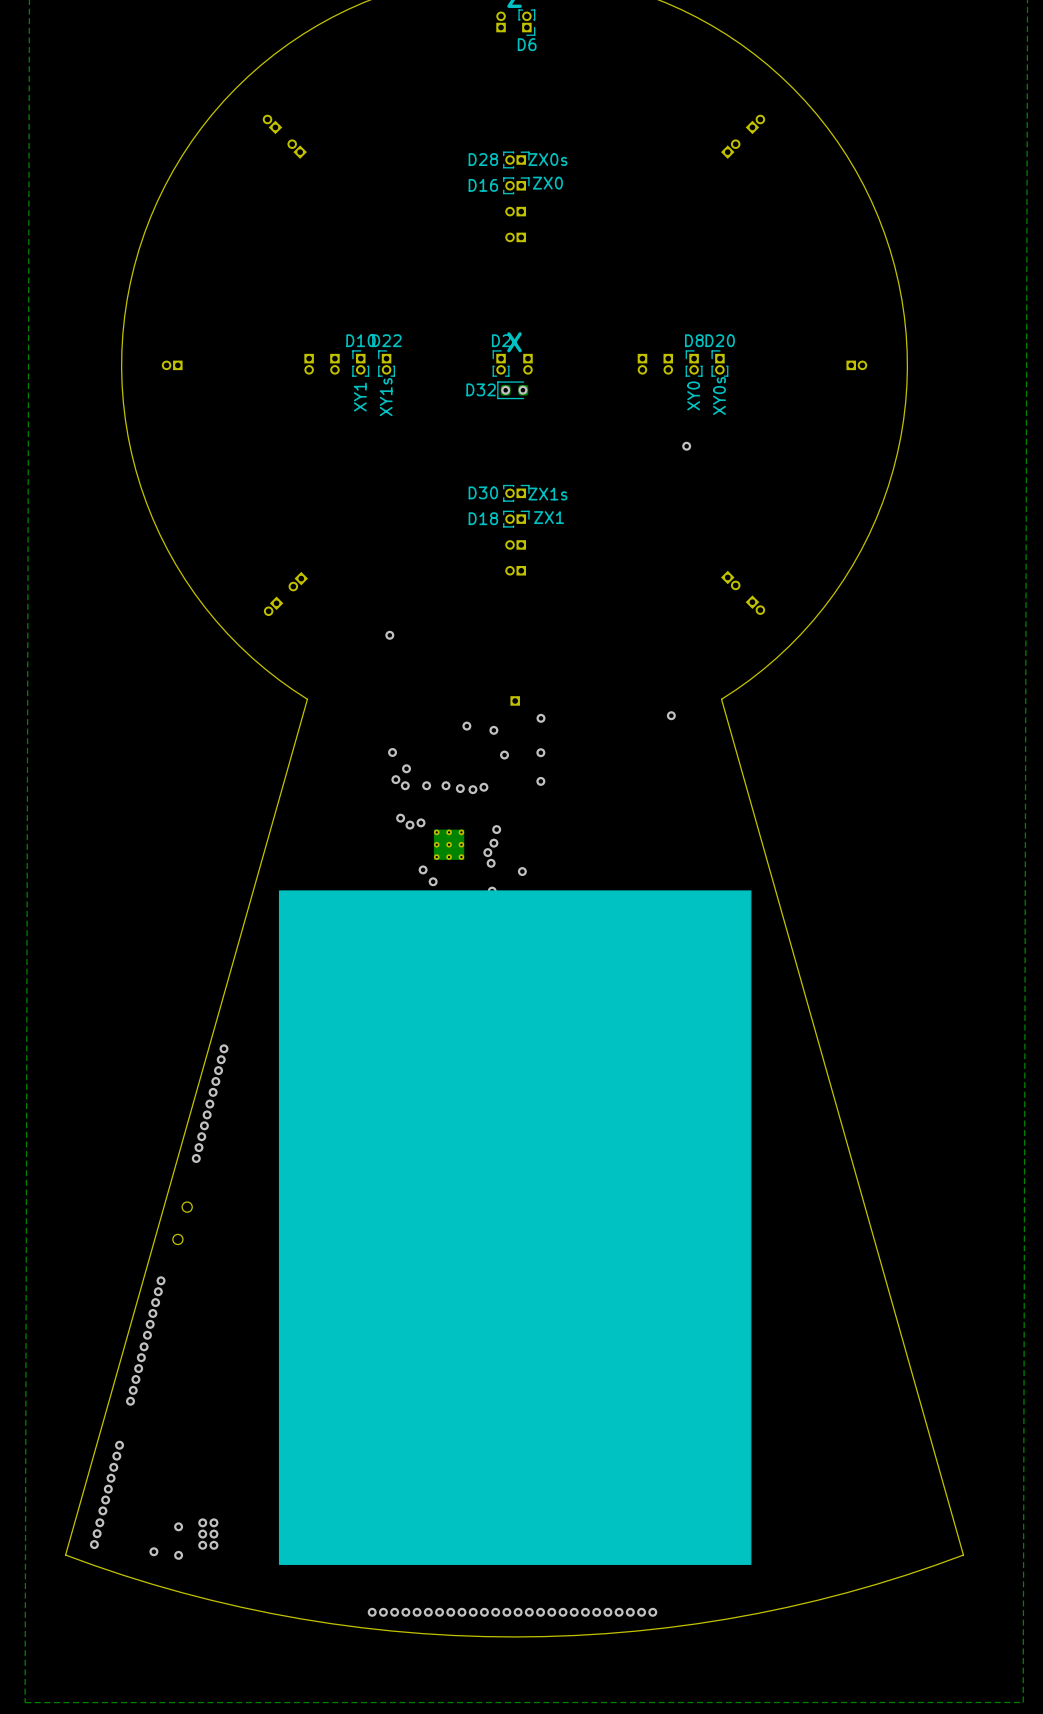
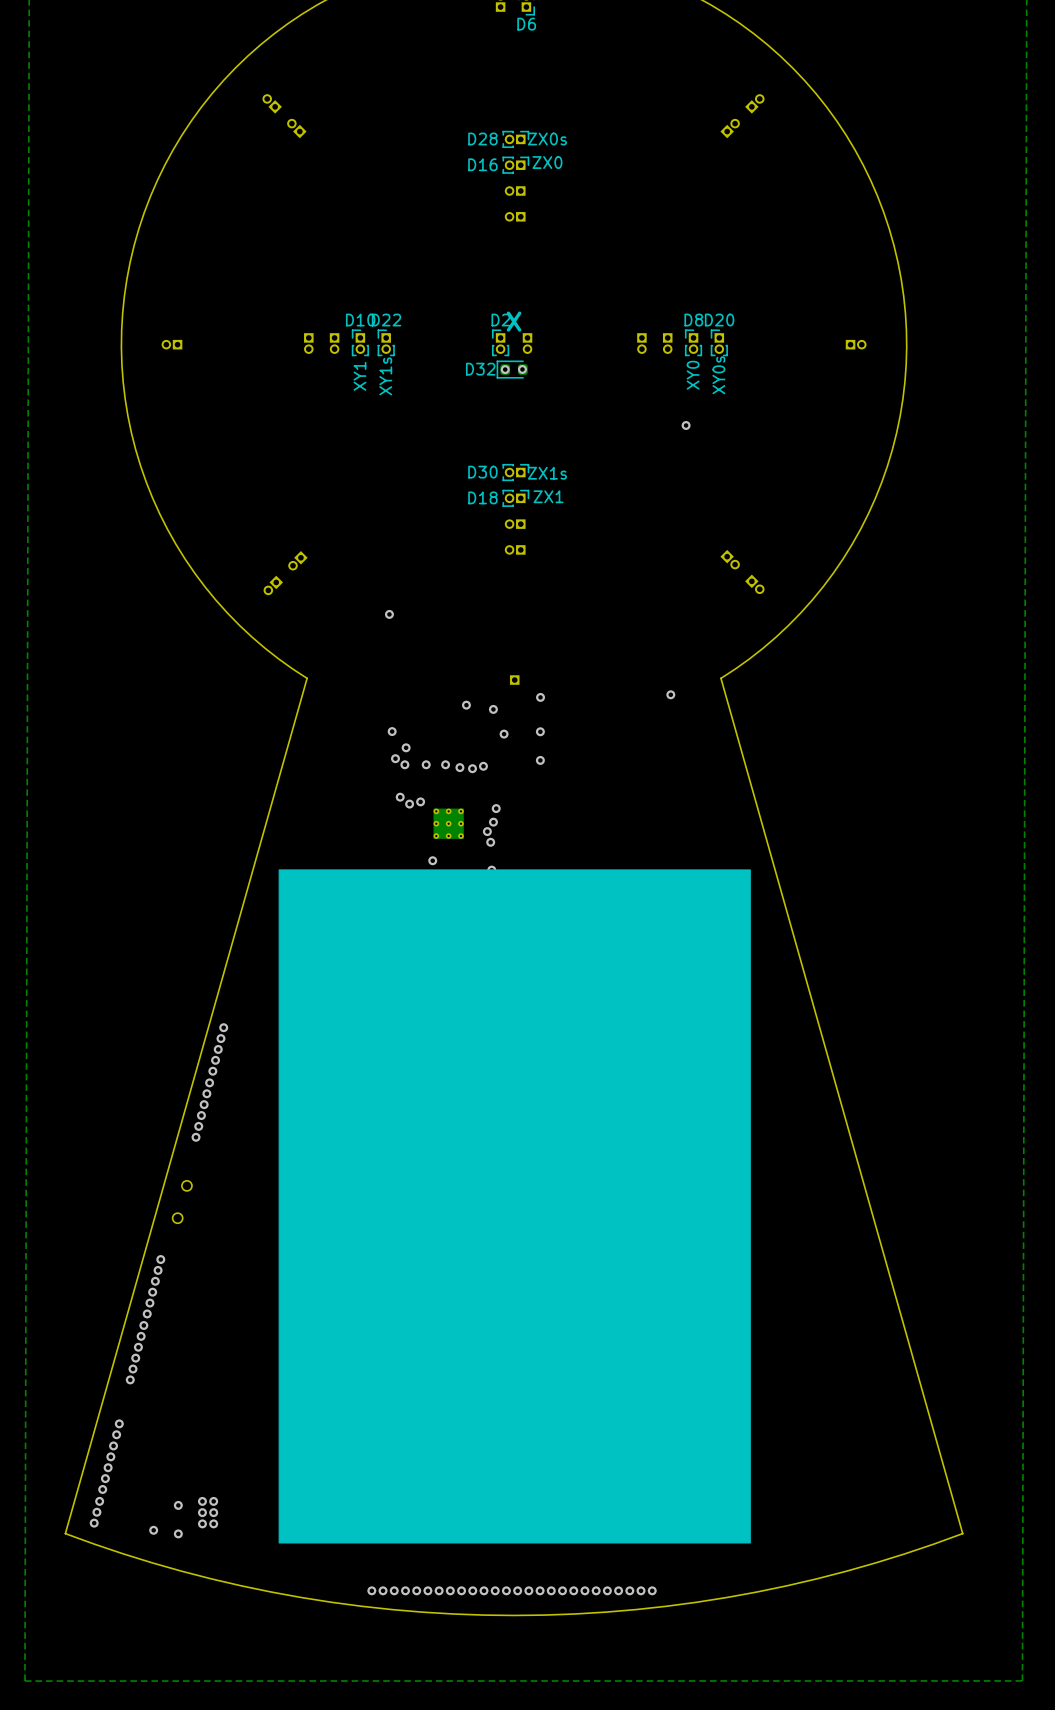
via: (423, 869) -> none
via: (522, 871) -> none

